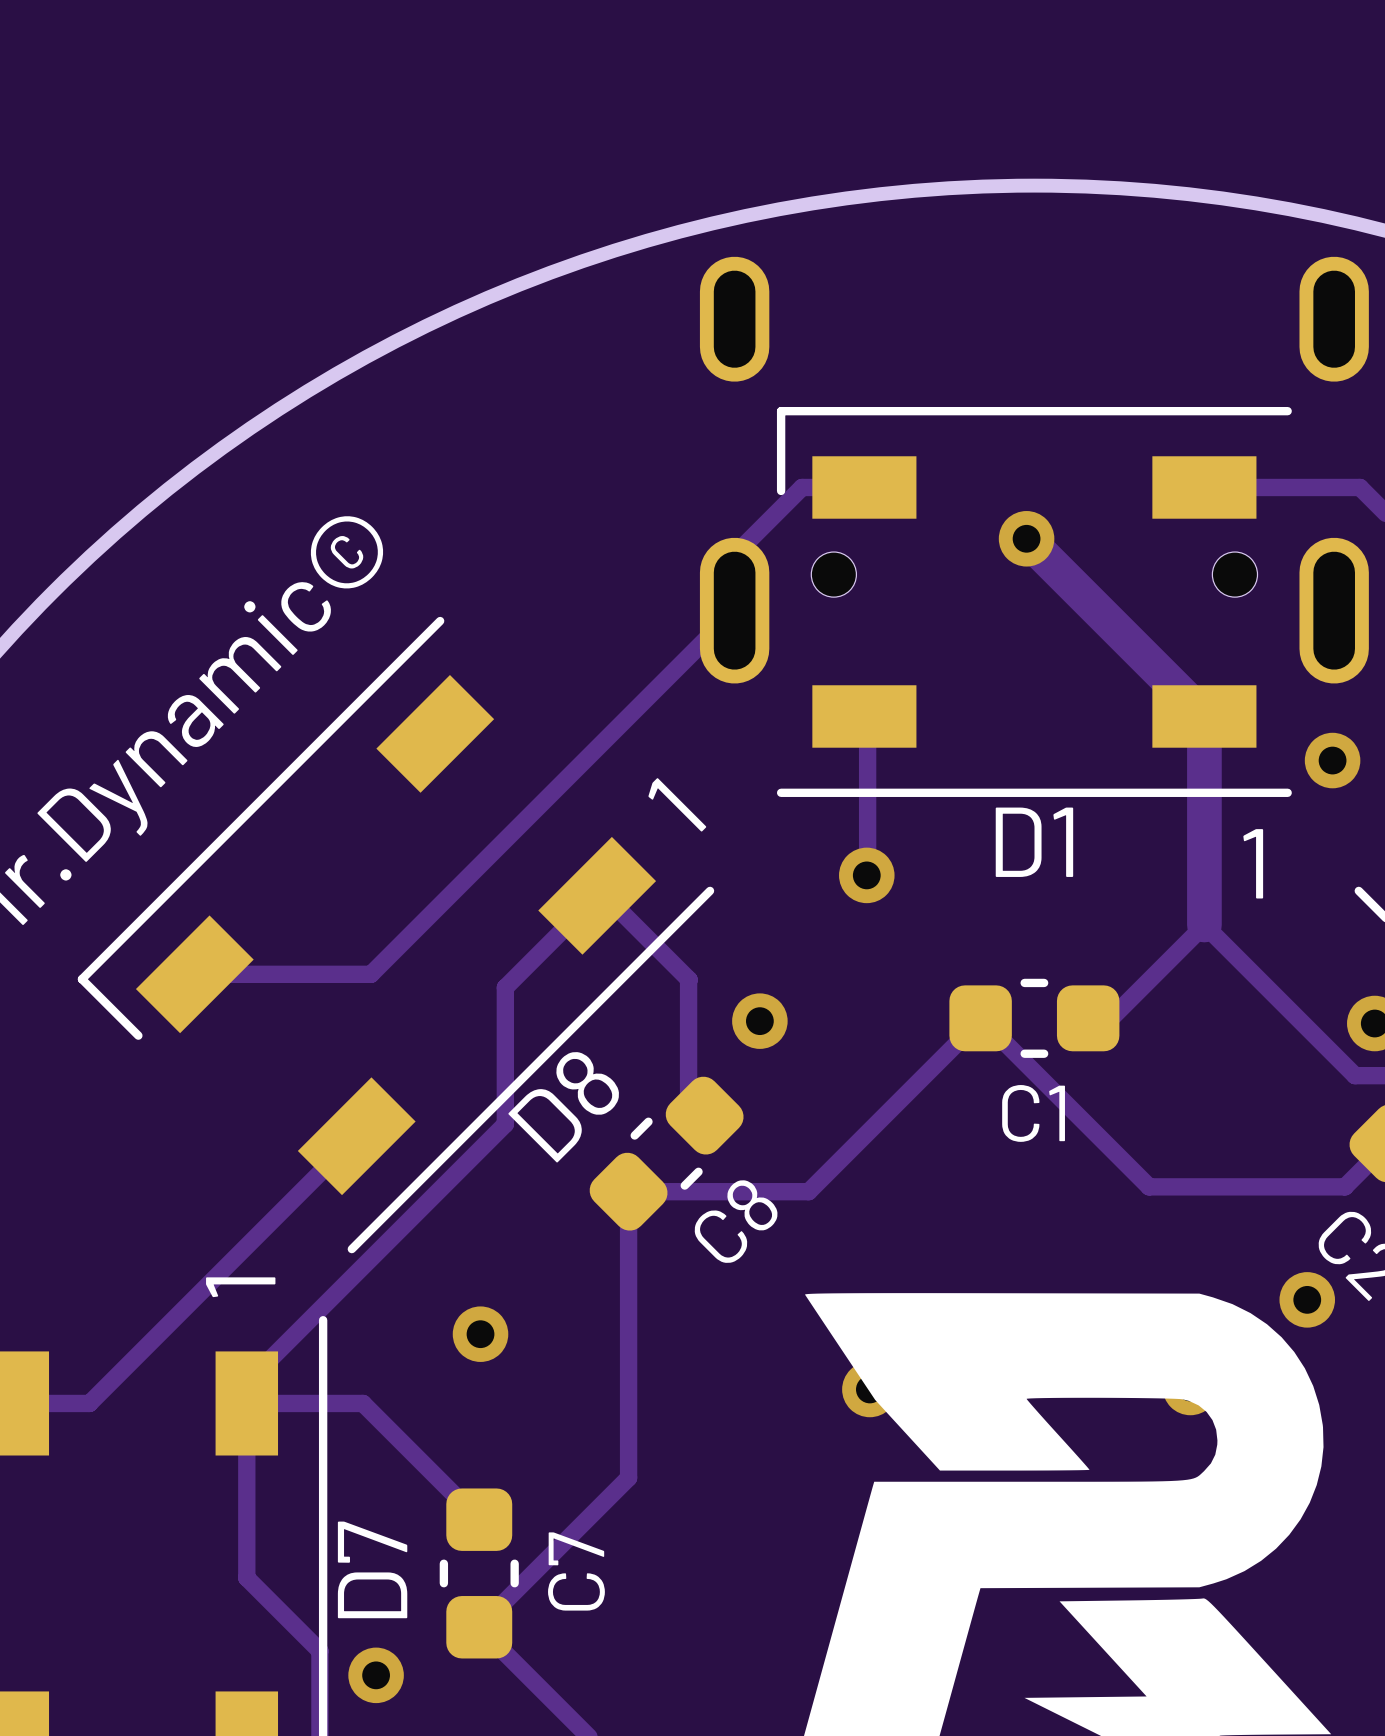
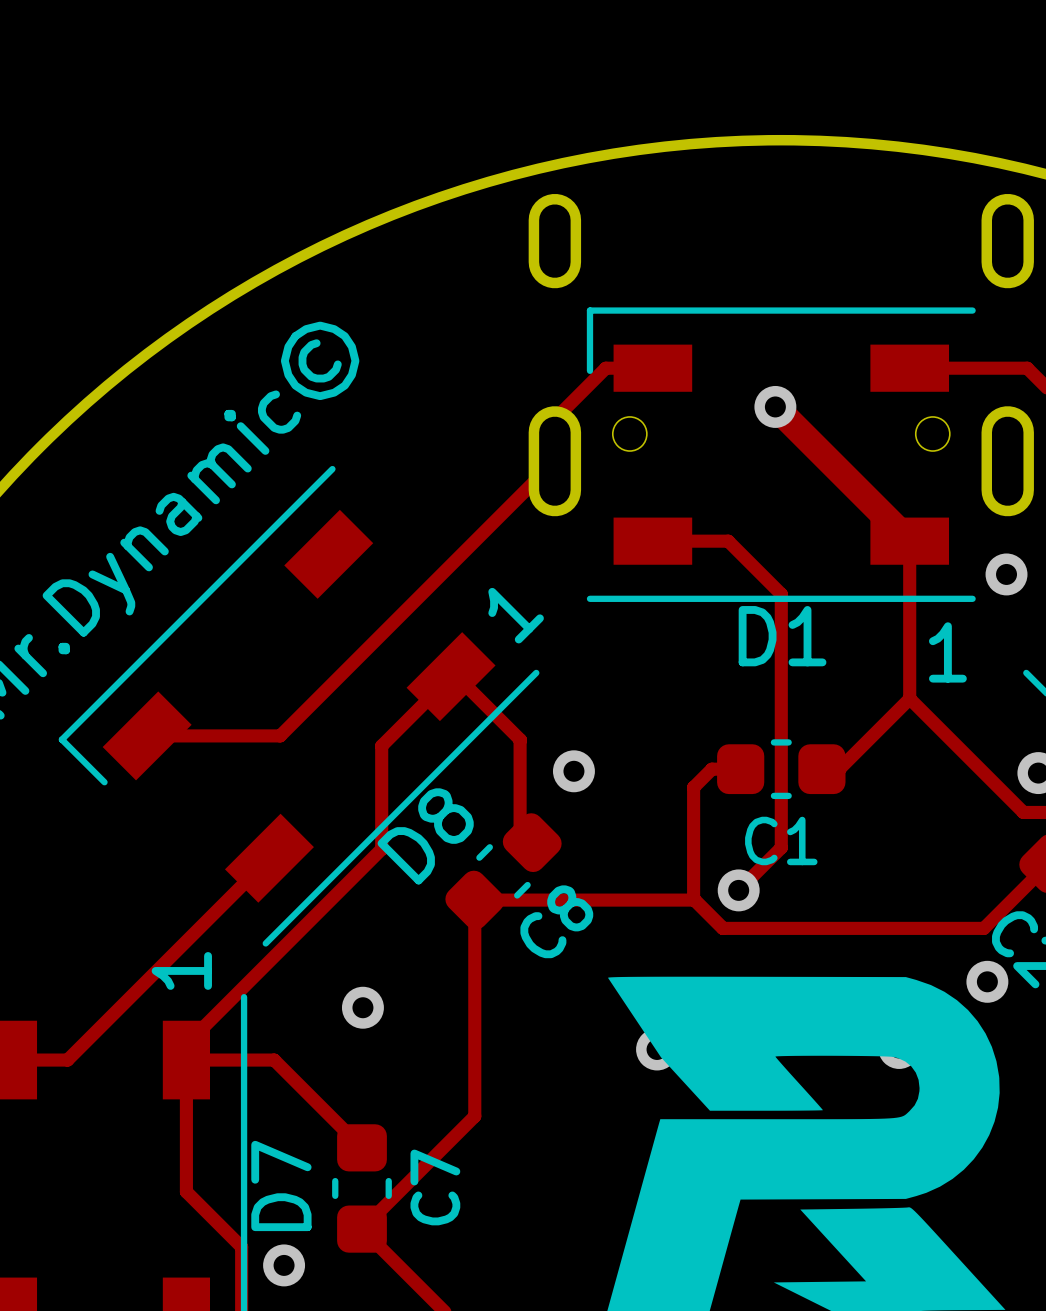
track: (864, 716) (867, 719) (867, 874) -> (652, 541) (728, 541) (781, 594) (781, 847) (738, 890)
track width: thick (1204, 716) (1204, 925) -> thin (909, 541) (909, 698)
via position: (866, 875) -> (738, 890)
track: (1344, 1186) (1149, 1186) (980, 1018) (808, 1191) -> (1015, 896) (983, 928) (722, 928) (693, 899) (693, 787) (711, 769) (740, 769)
track: none -> (610, 900) (694, 900)

